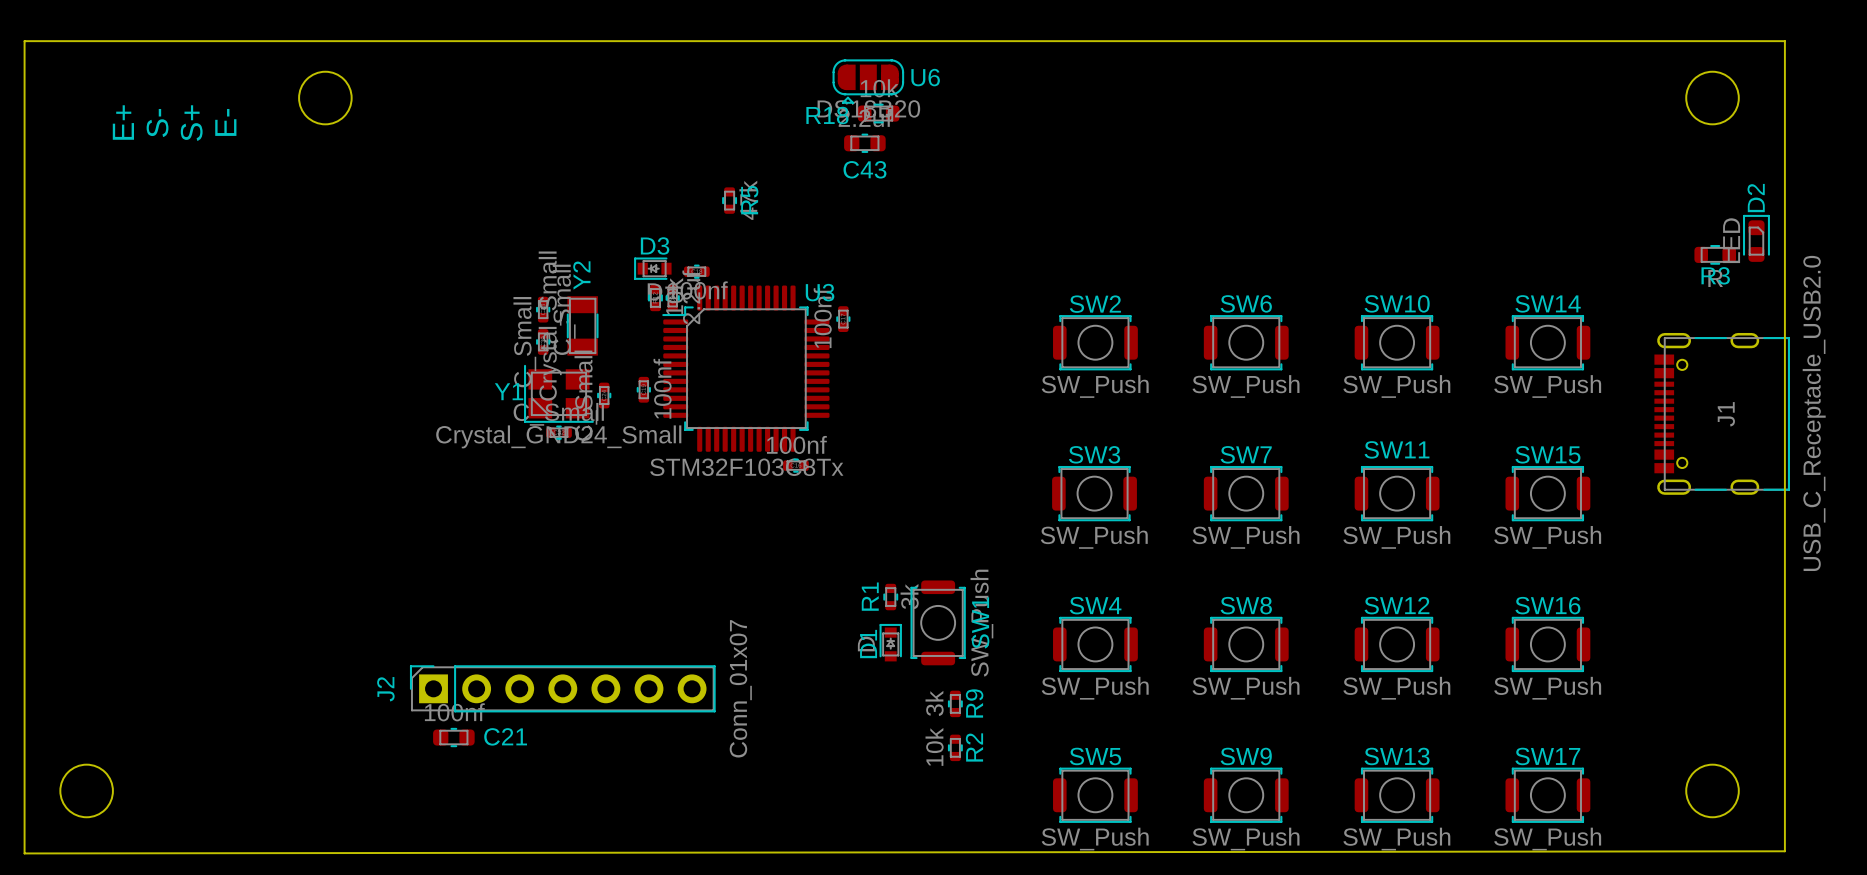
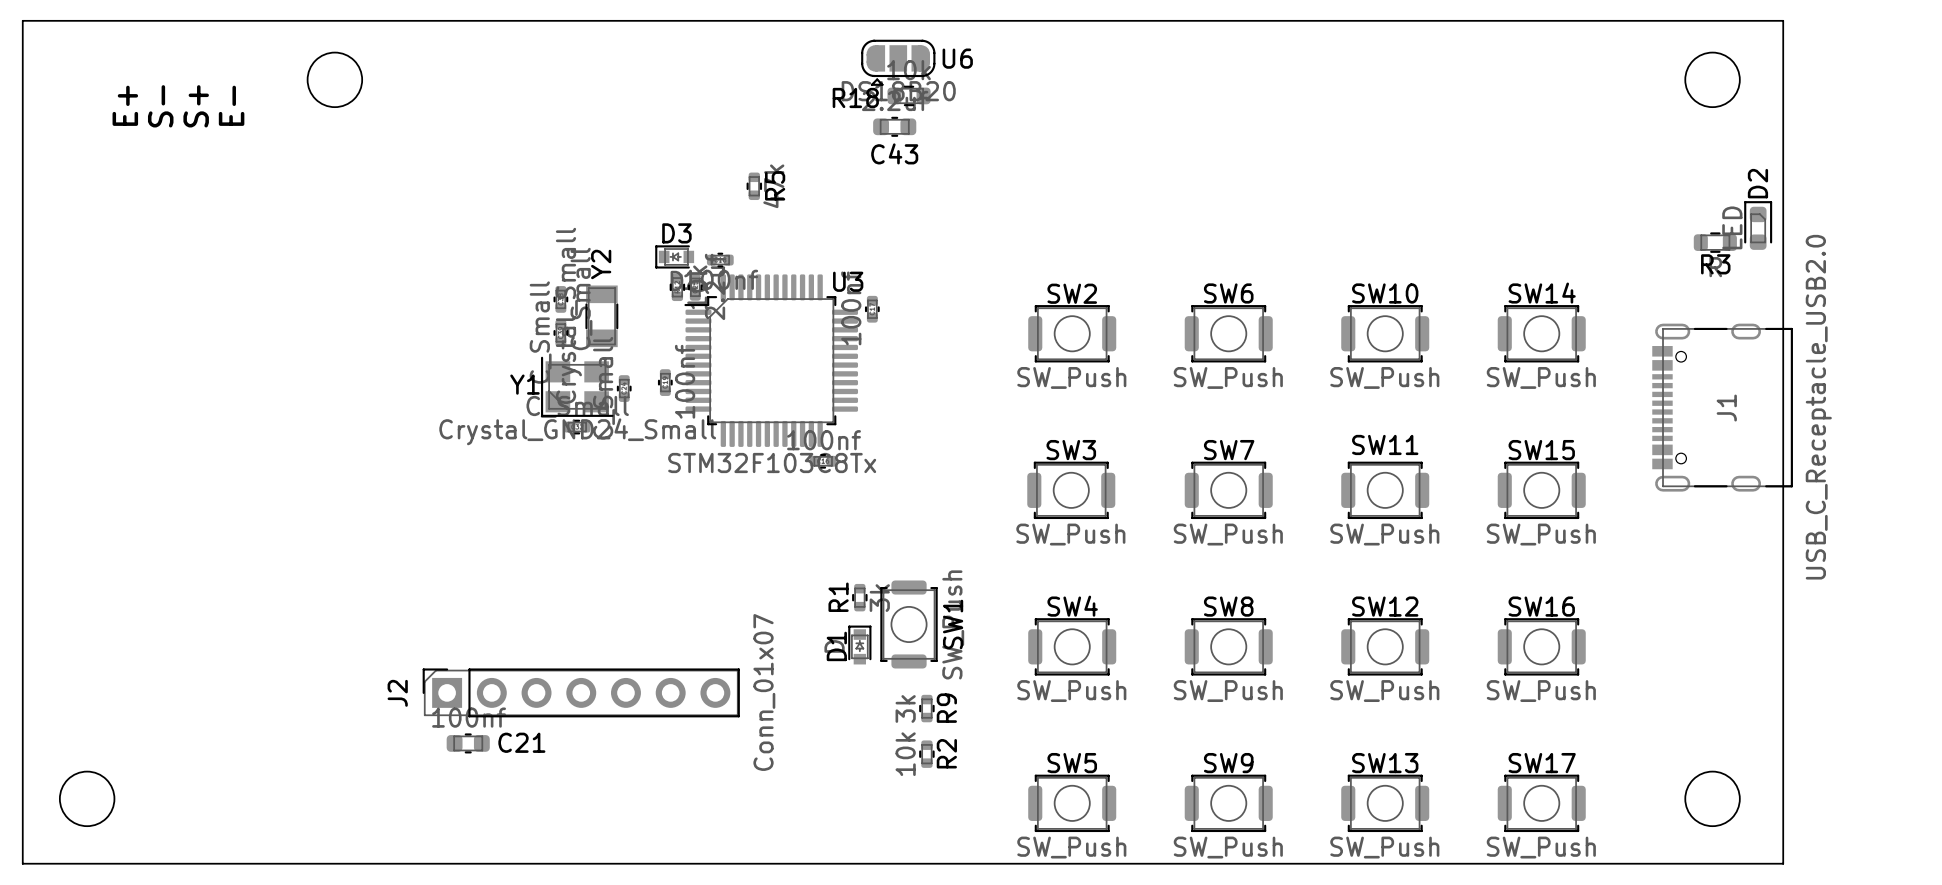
board edge: (1721, 41) (1784, 41) (1784, 851) (24, 853) -> (1783, 20) (1783, 863) (22, 863)
round board edge position: (1712, 98) -> (1712, 79)
D2 position: (1756, 238) -> (1758, 225)
R3 position: (1715, 254) -> (1715, 242)
SW2 position: (1095, 342) -> (1072, 333)
SW6 position: (1246, 342) -> (1228, 333)
SW10 position: (1397, 342) -> (1385, 333)
SW14 position: (1547, 342) -> (1541, 333)
J1 position: (1722, 413) -> (1722, 407)
SW3 position: (1094, 493) -> (1071, 490)
SW7 position: (1246, 493) -> (1228, 490)
SW11 position: (1397, 493) -> (1385, 490)
SW15 position: (1547, 493) -> (1541, 490)
R1 position: (890, 597) -> (859, 597)
SW1 position: (938, 622) -> (909, 624)
D1 position: (890, 642) -> (859, 645)
SW4 position: (1095, 644) -> (1072, 646)
SW8 position: (1246, 644) -> (1228, 646)
SW12 position: (1397, 644) -> (1385, 646)
SW16 position: (1547, 644) -> (1541, 646)
R9 position: (955, 703) -> (926, 708)
R2 position: (955, 747) -> (926, 754)
round board edge position: (1712, 790) -> (1712, 798)
SW5 position: (1095, 795) -> (1072, 803)
SW9 position: (1246, 795) -> (1228, 803)
SW13 position: (1397, 795) -> (1385, 803)
SW17 position: (1547, 795) -> (1541, 803)

